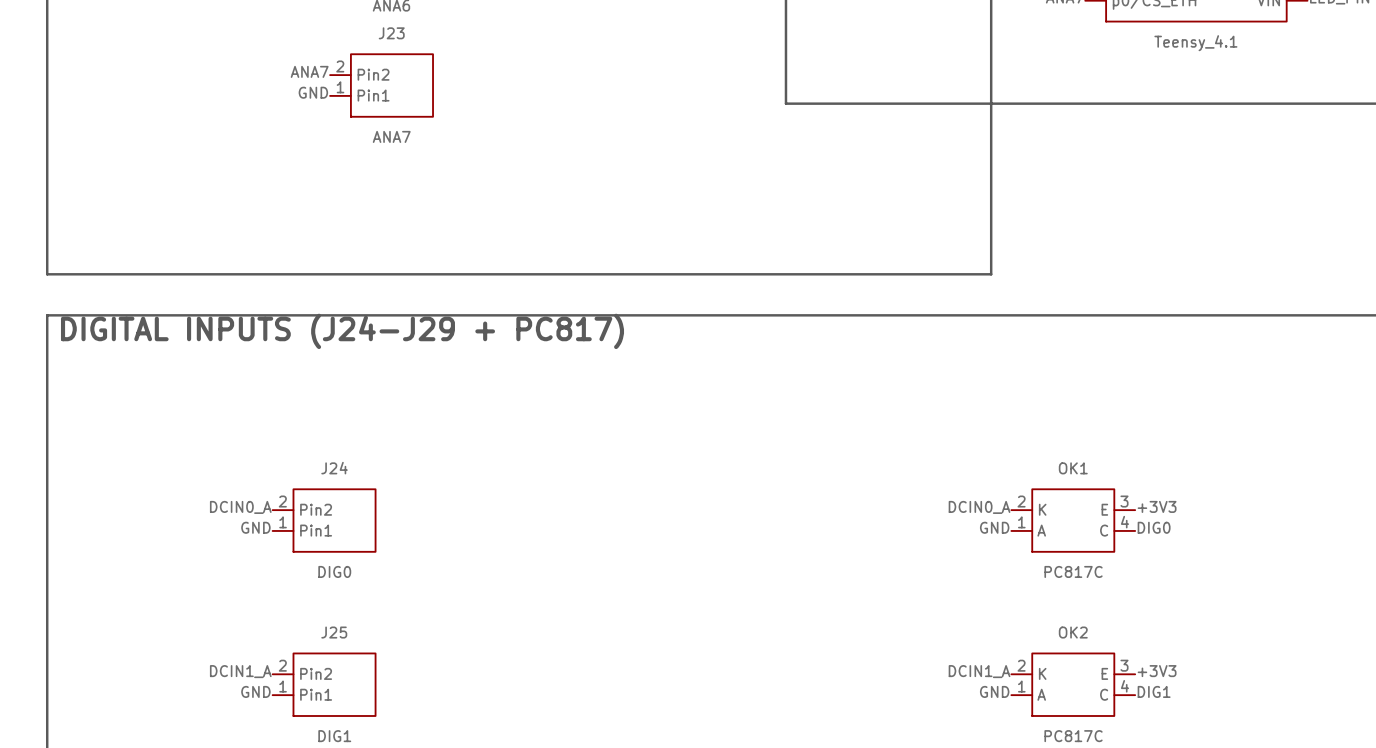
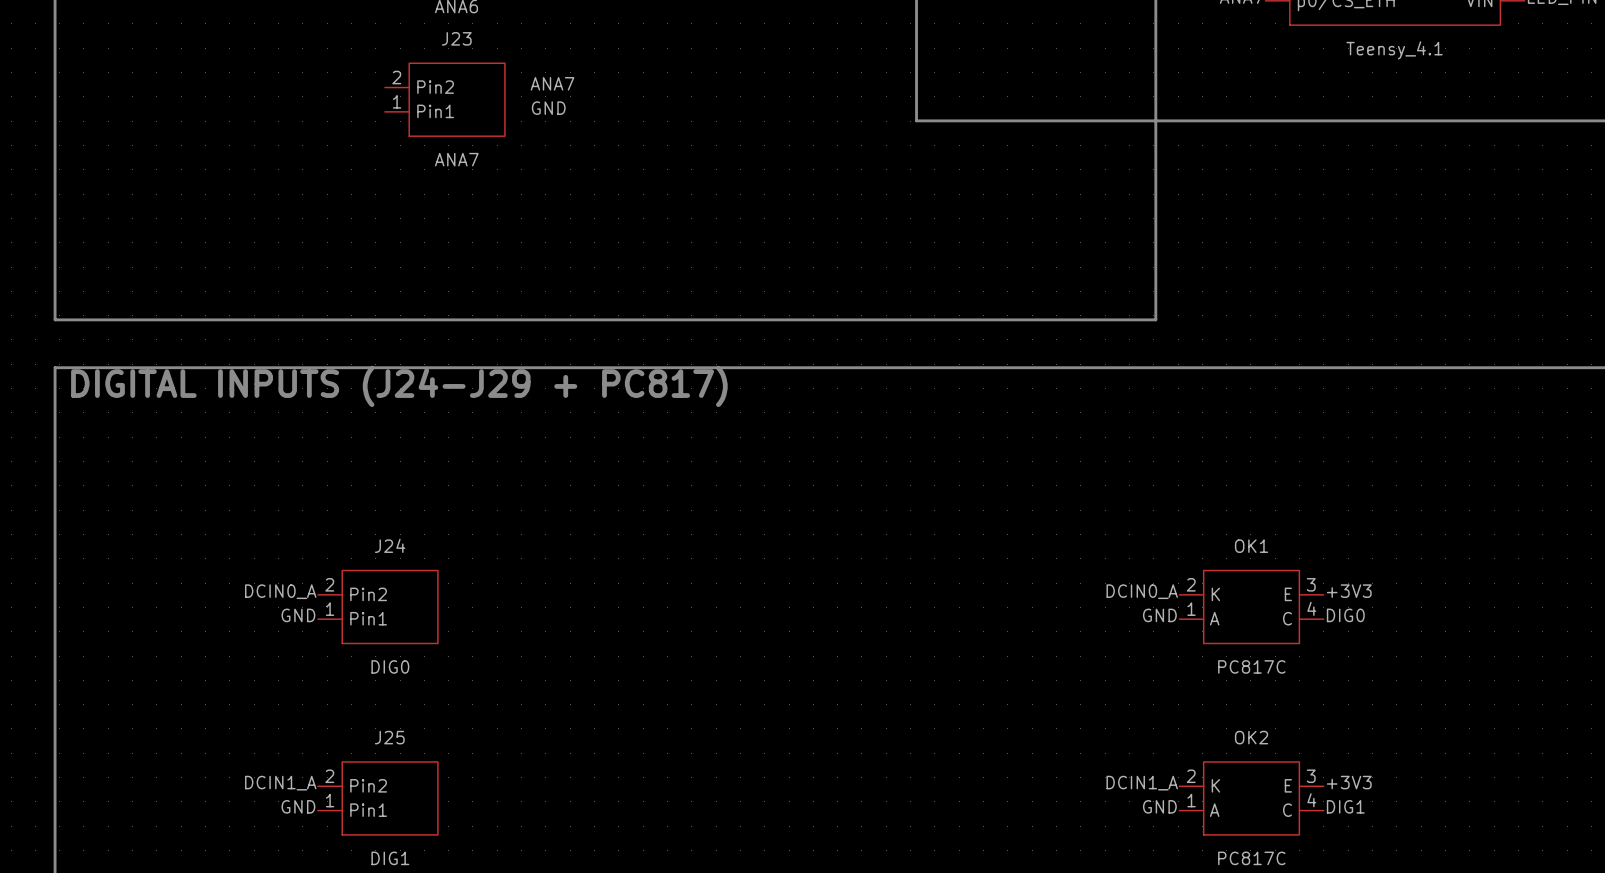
label position: ANA7 (309, 71) -> ANA7 (552, 83)
label position: GND (313, 92) -> GND (548, 108)

